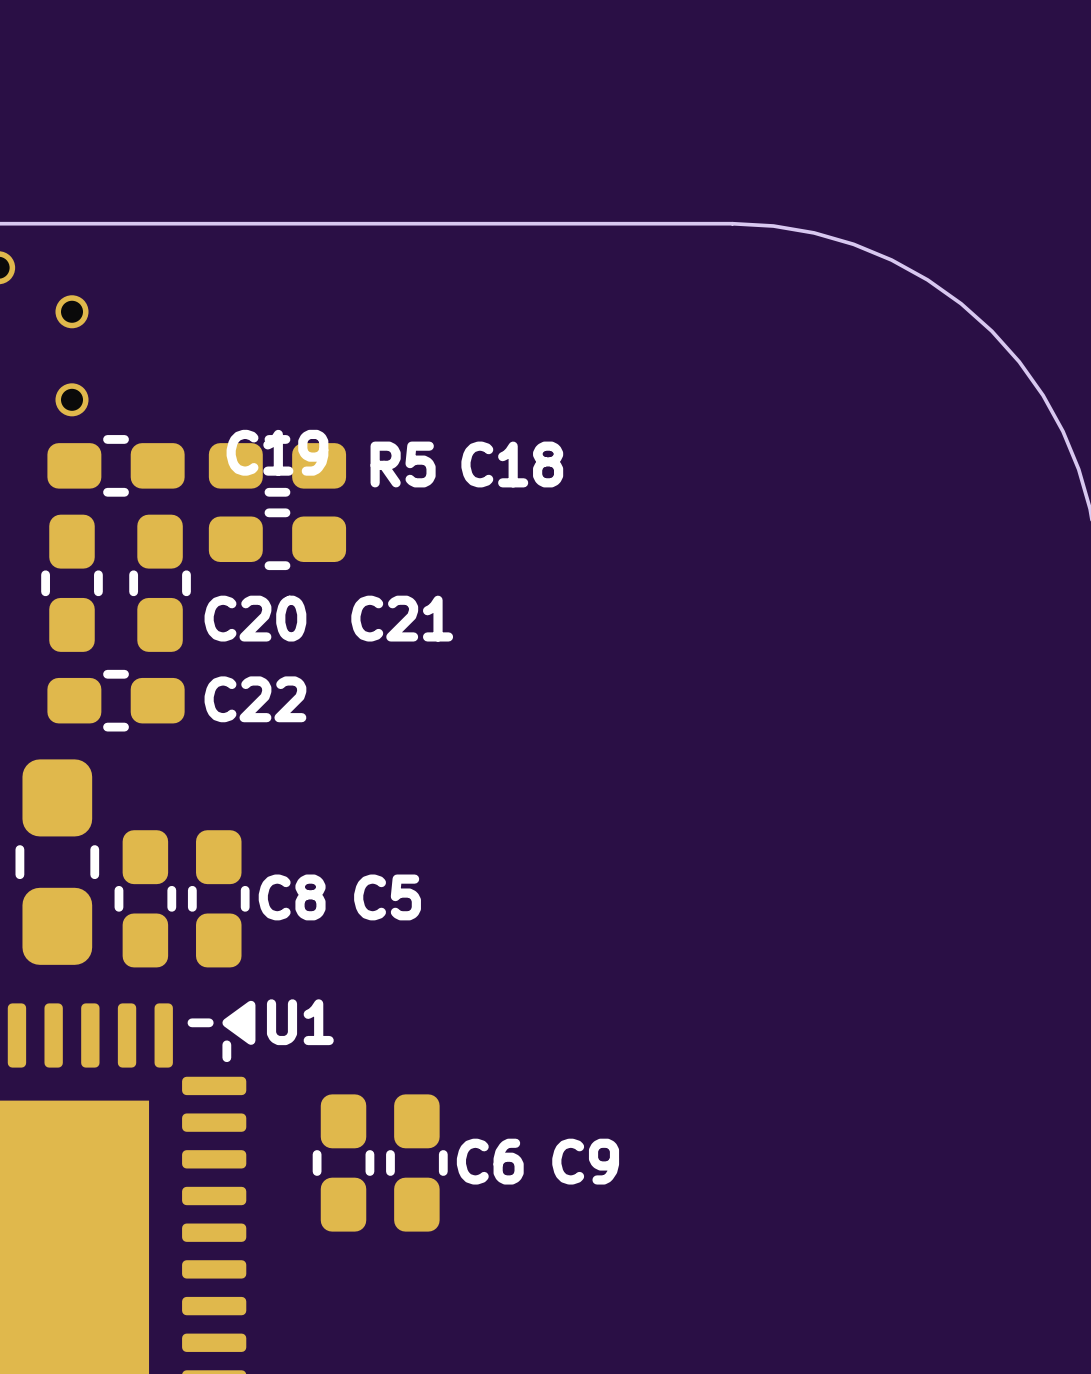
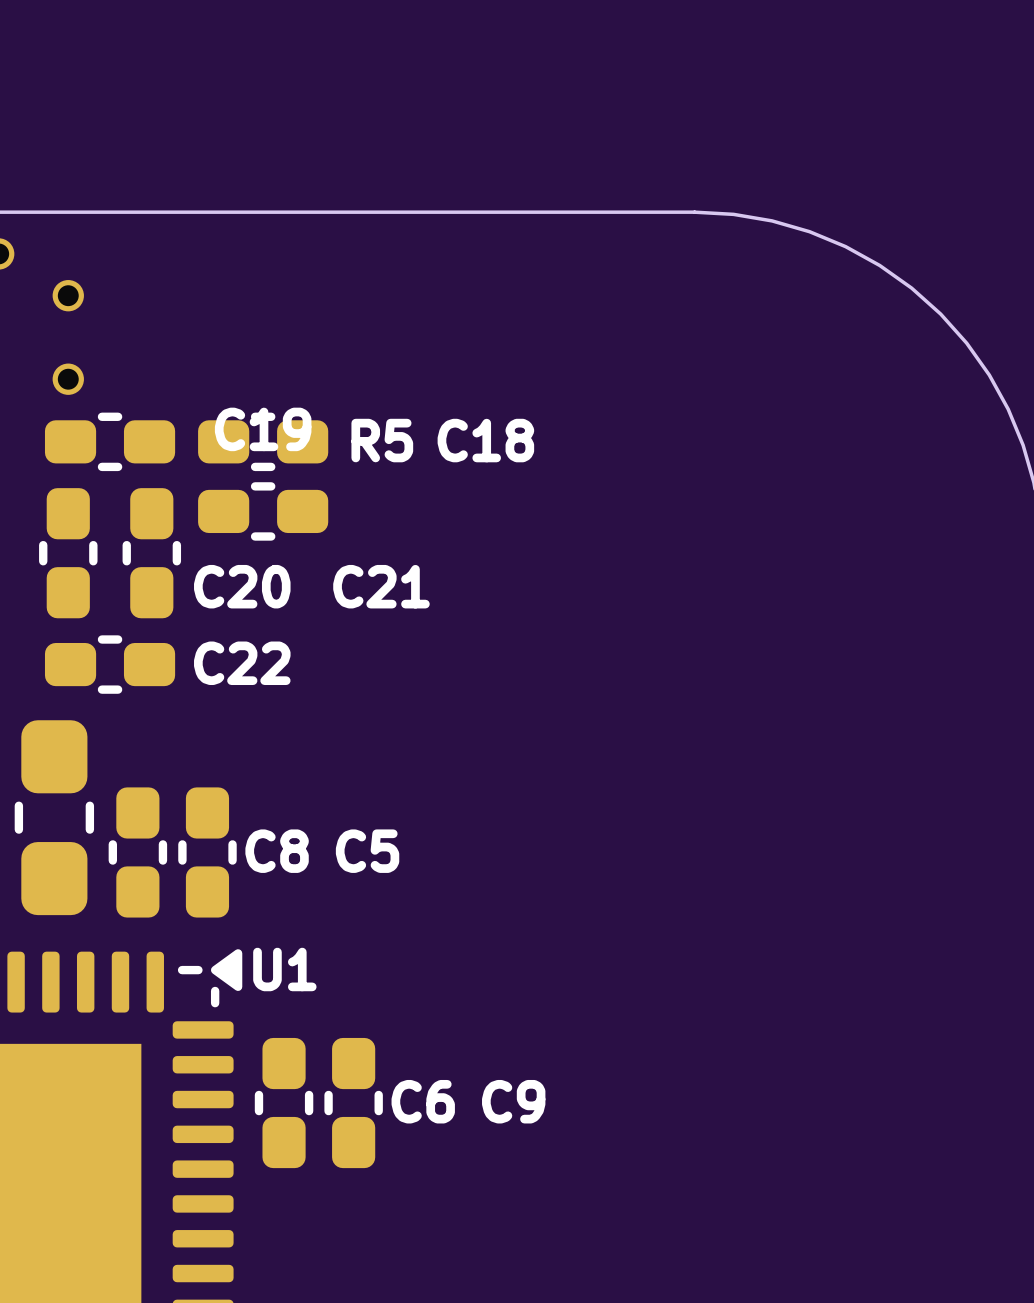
C6 position: (343, 1162) -> (284, 1103)
C9 position: (416, 1162) -> (353, 1103)

